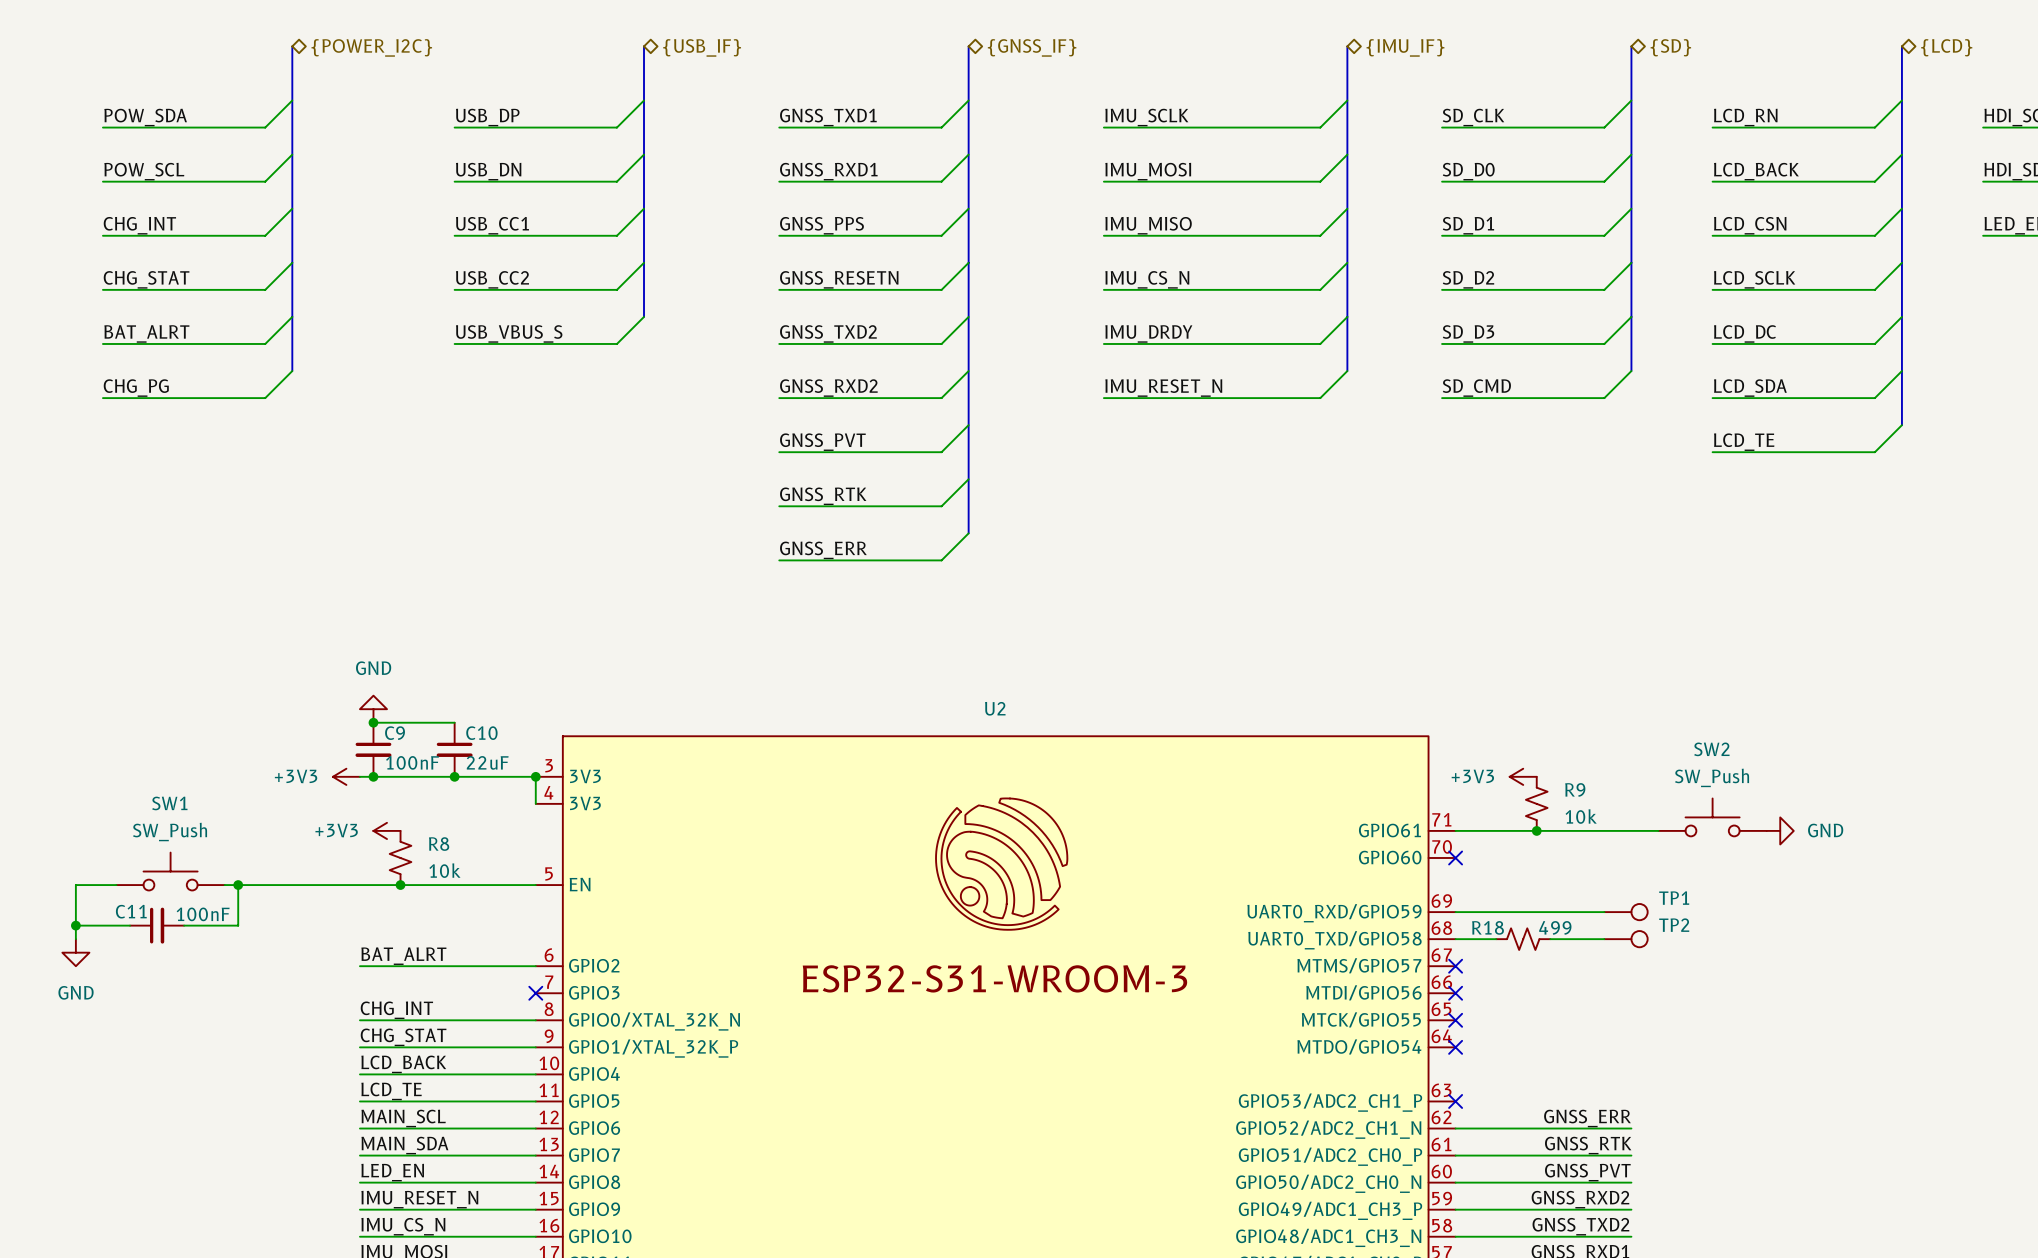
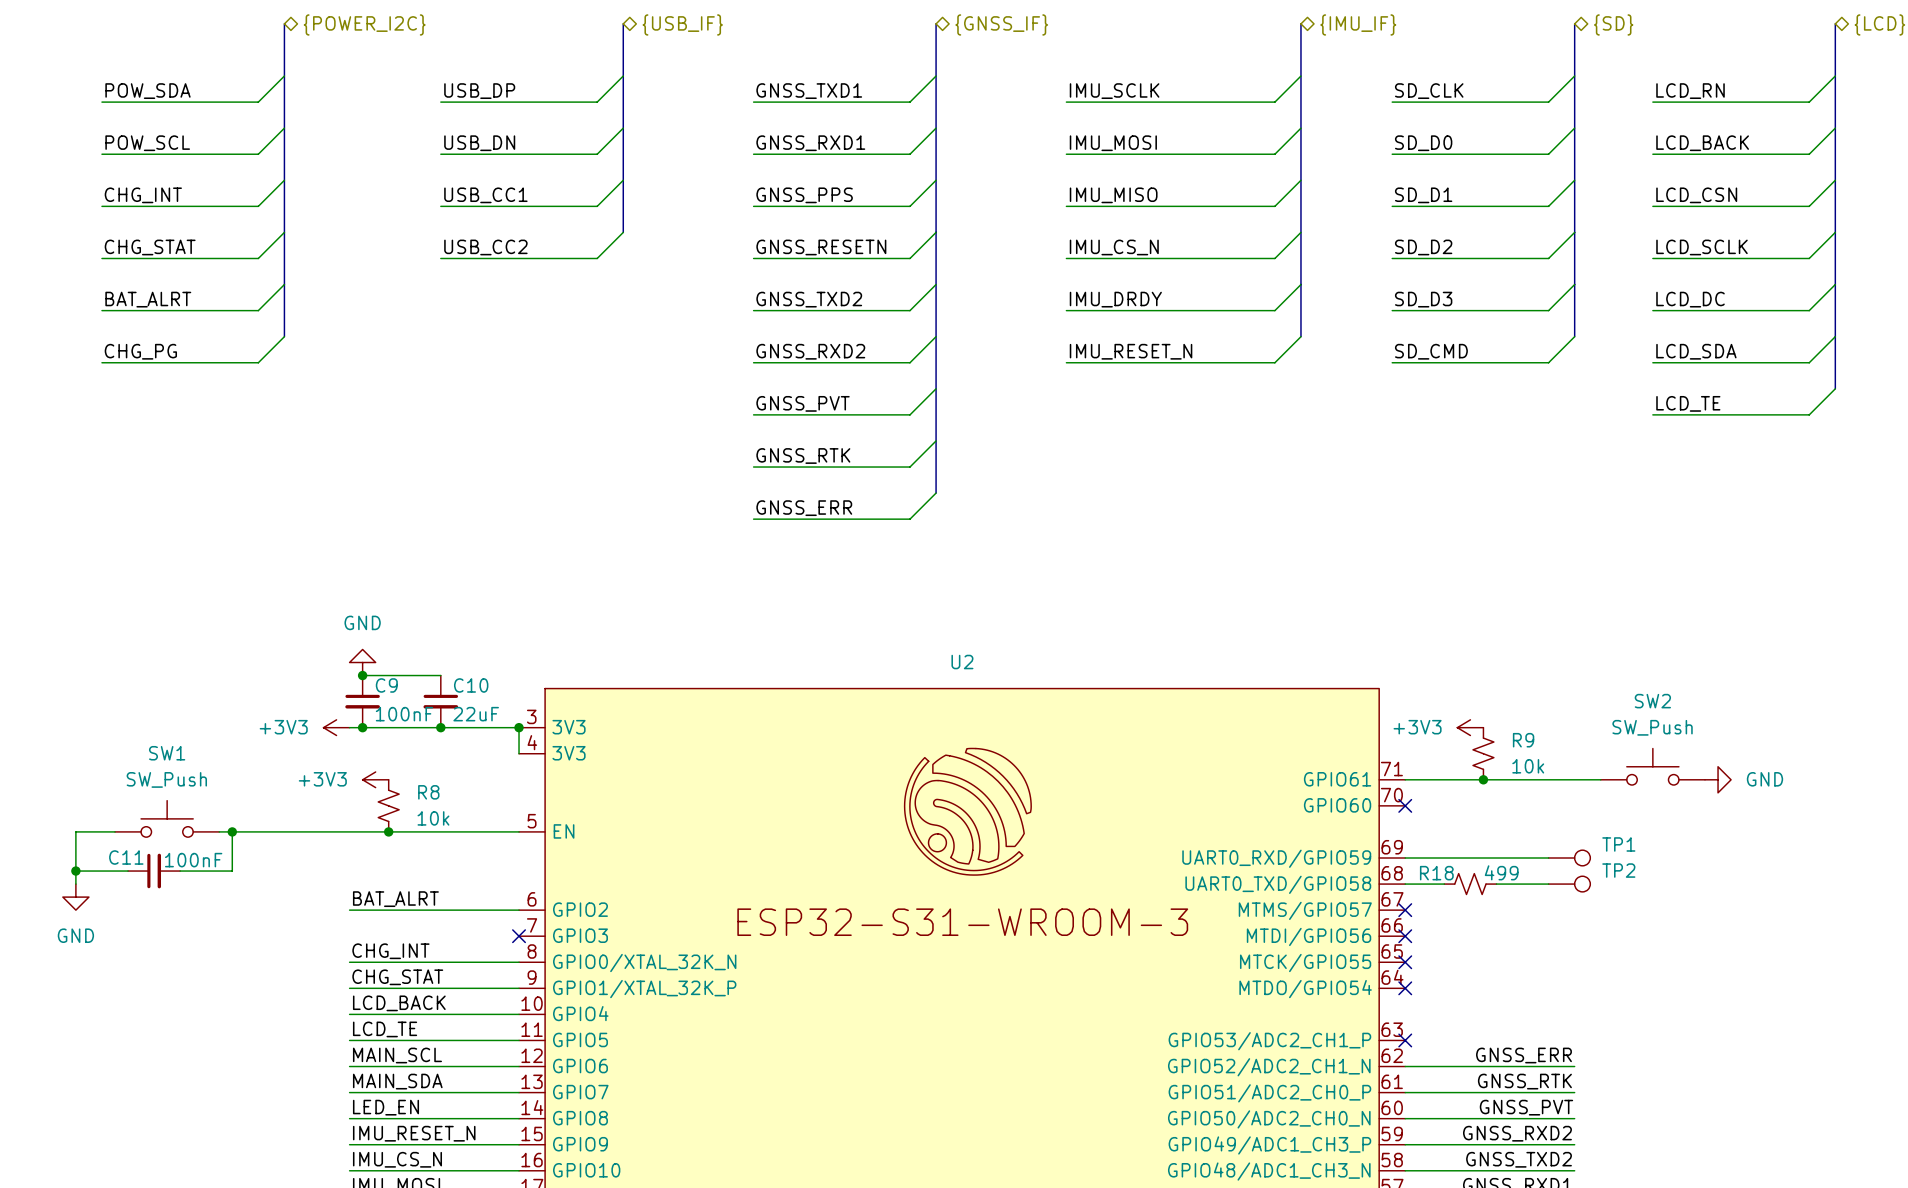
bus: (644, 262) (644, 316) -> none
wire: (644, 316) (616, 343) (454, 343) -> none
label: USB_VBUS_S (509, 333) -> none

